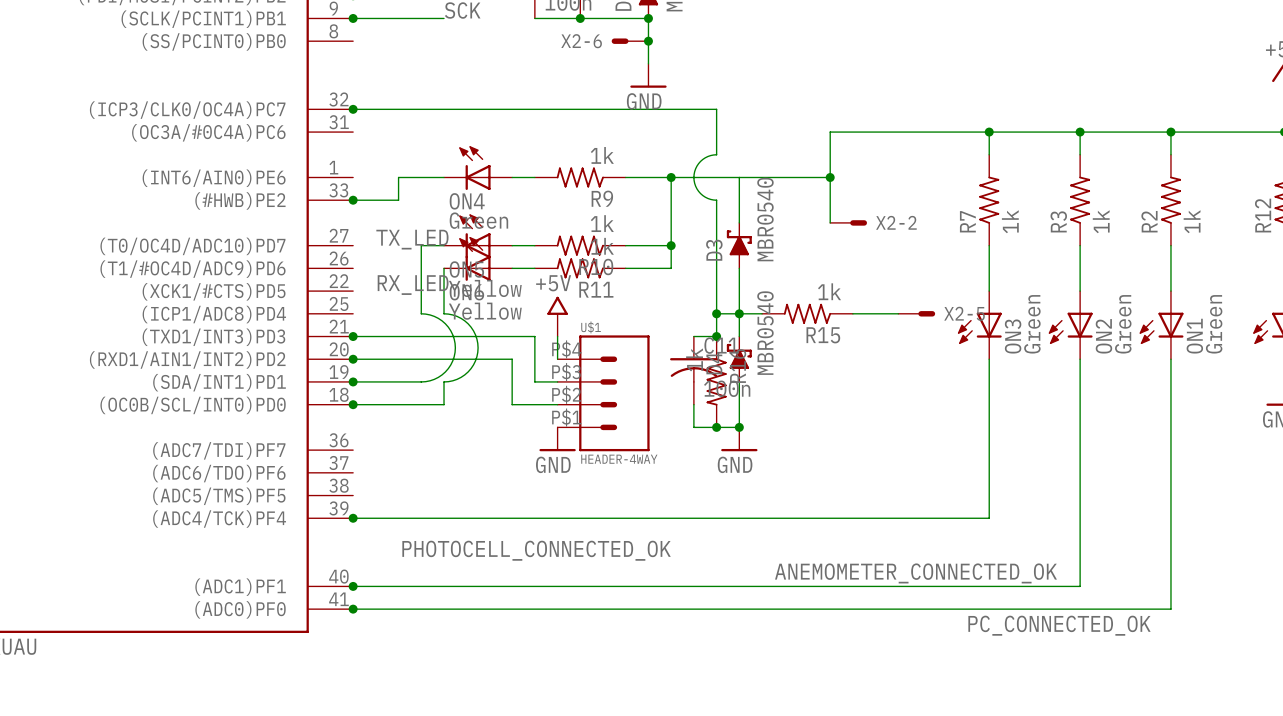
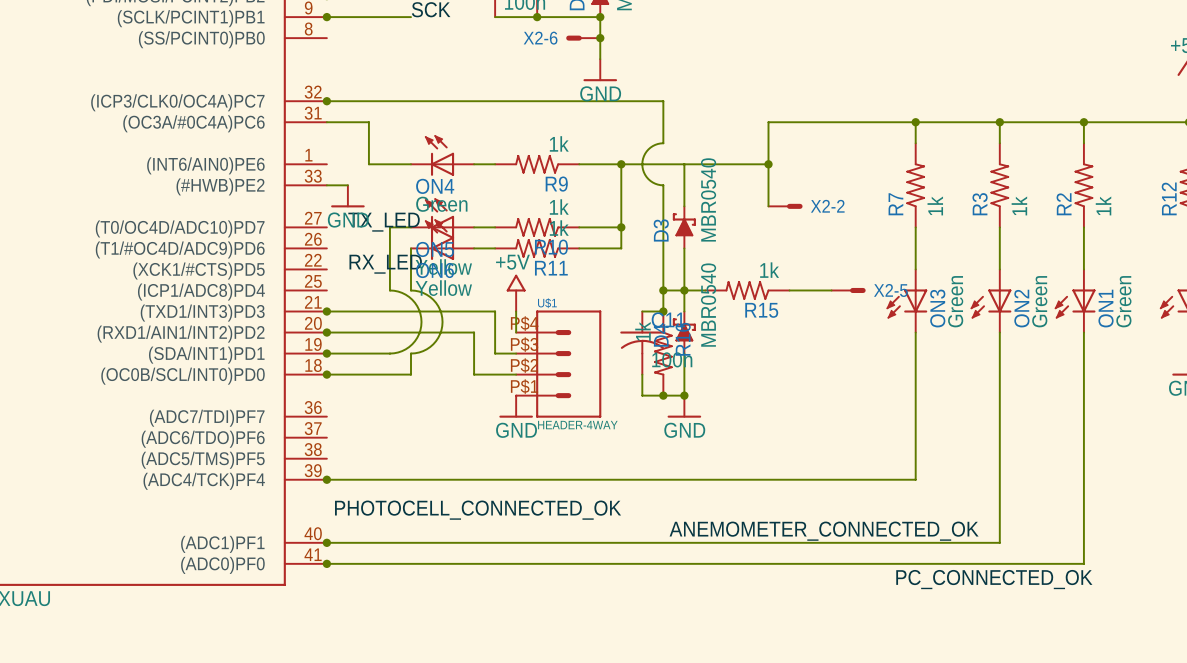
wire: (398, 177) (398, 200) (375, 200) -> (368, 164) (368, 122) (326, 122)
junction: (353, 200) -> none
power symbol: none -> GND (347, 196)

